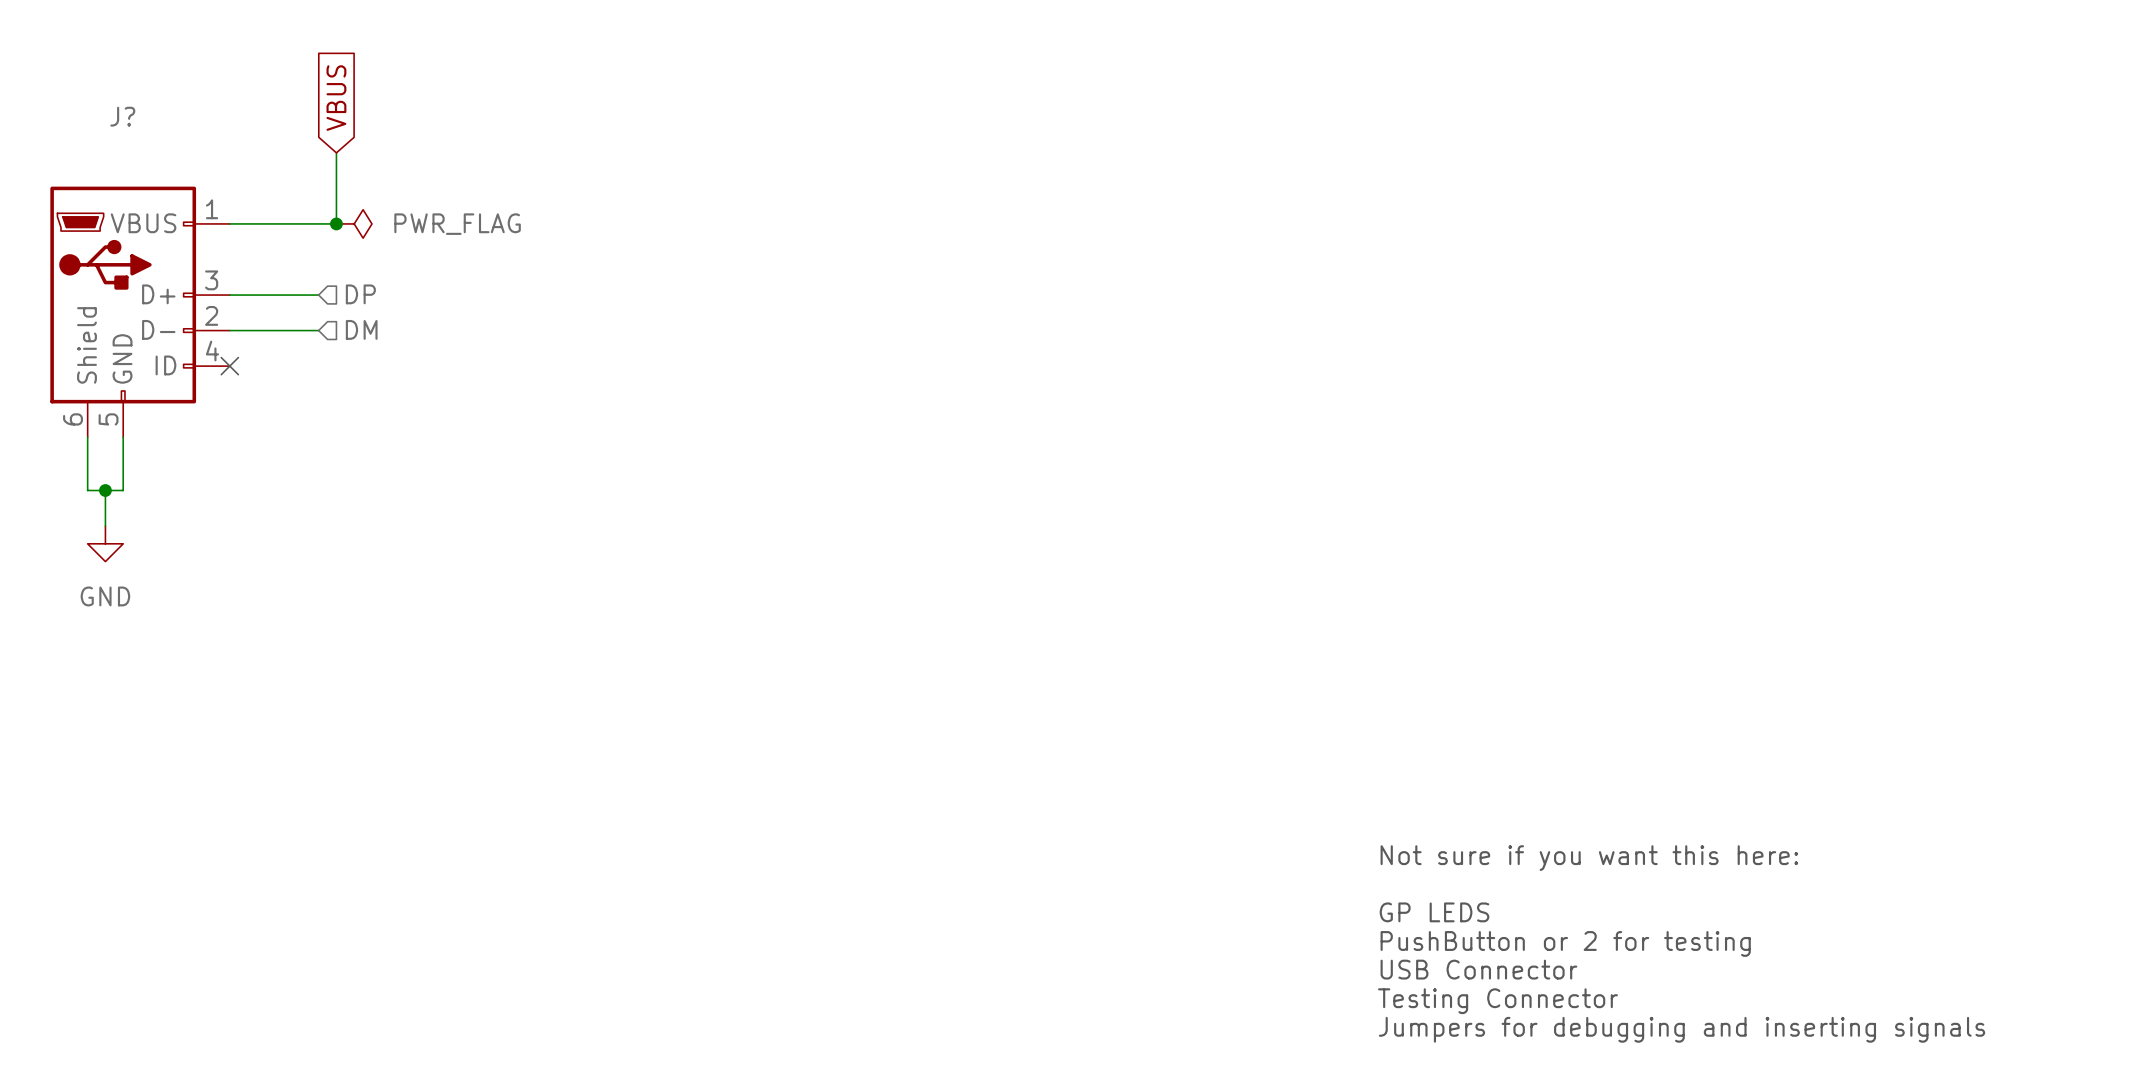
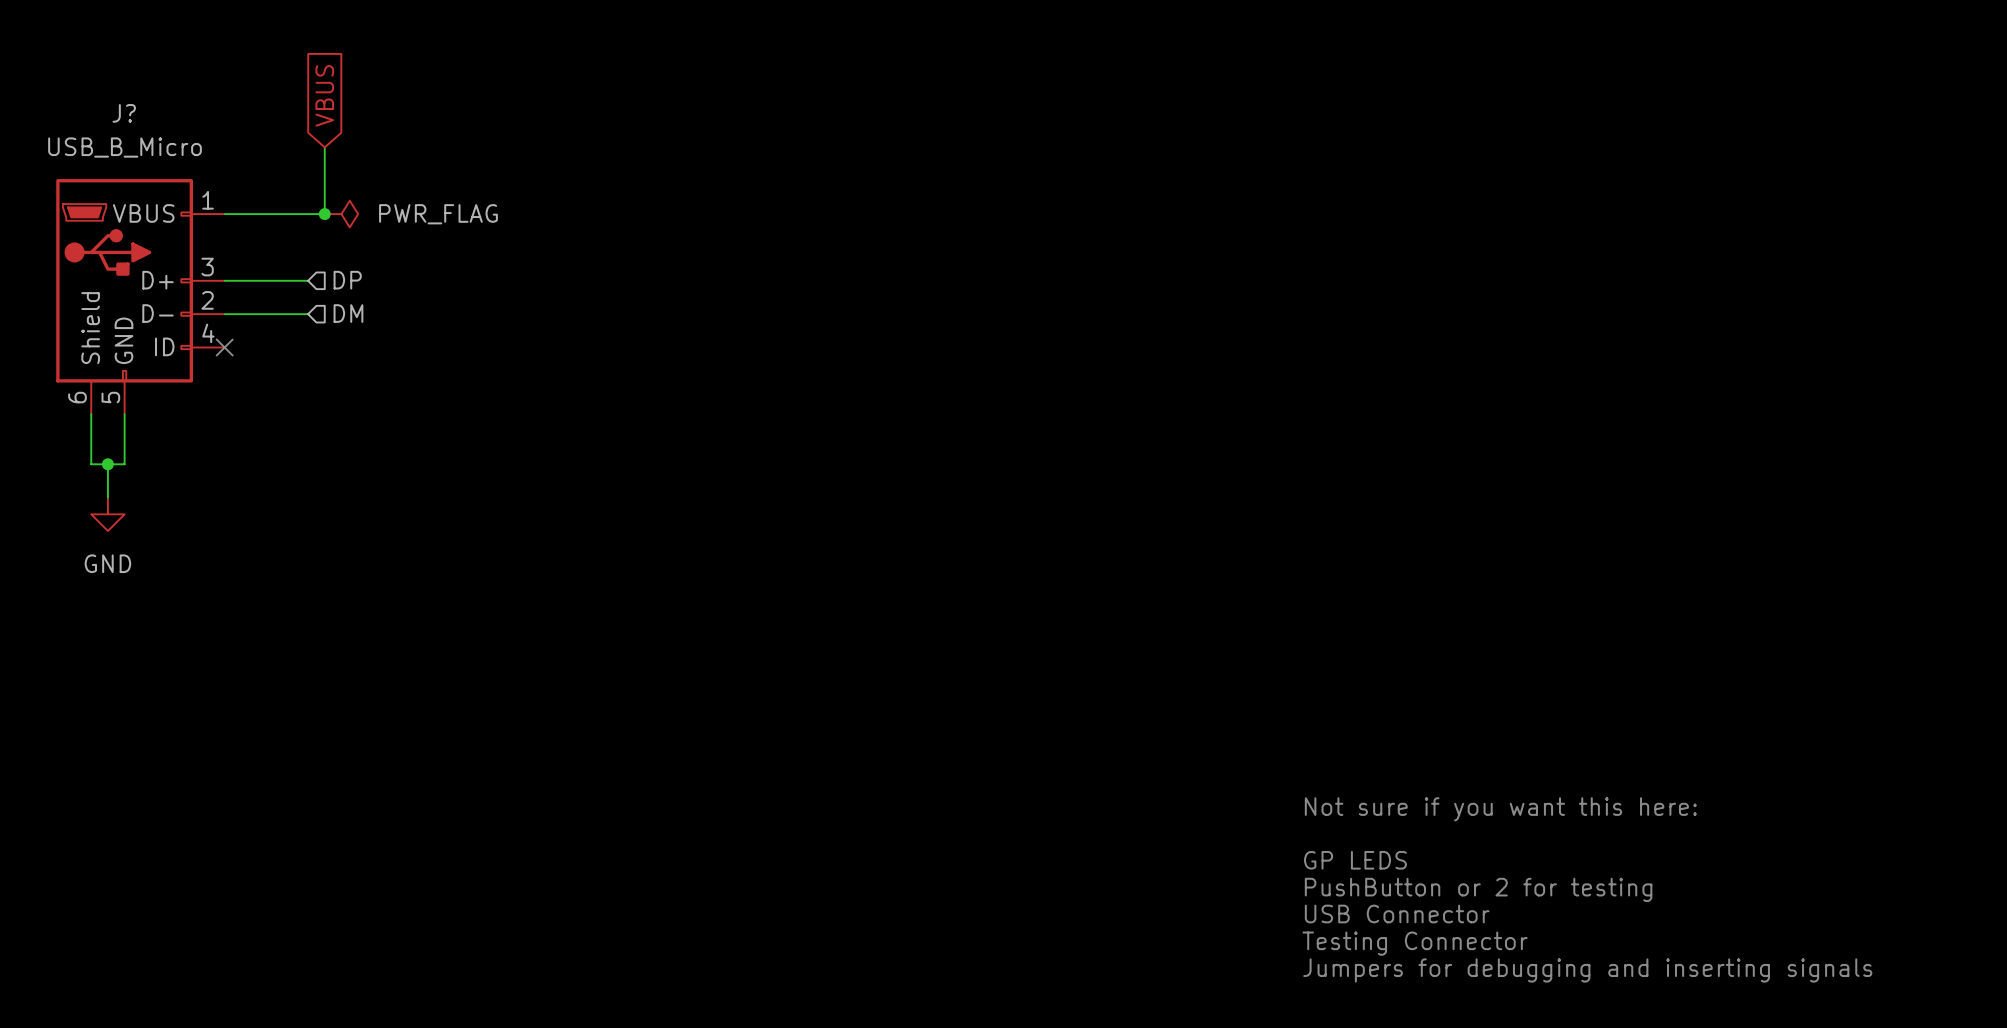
J? value: none -> USB_B_Micro (125, 147)

